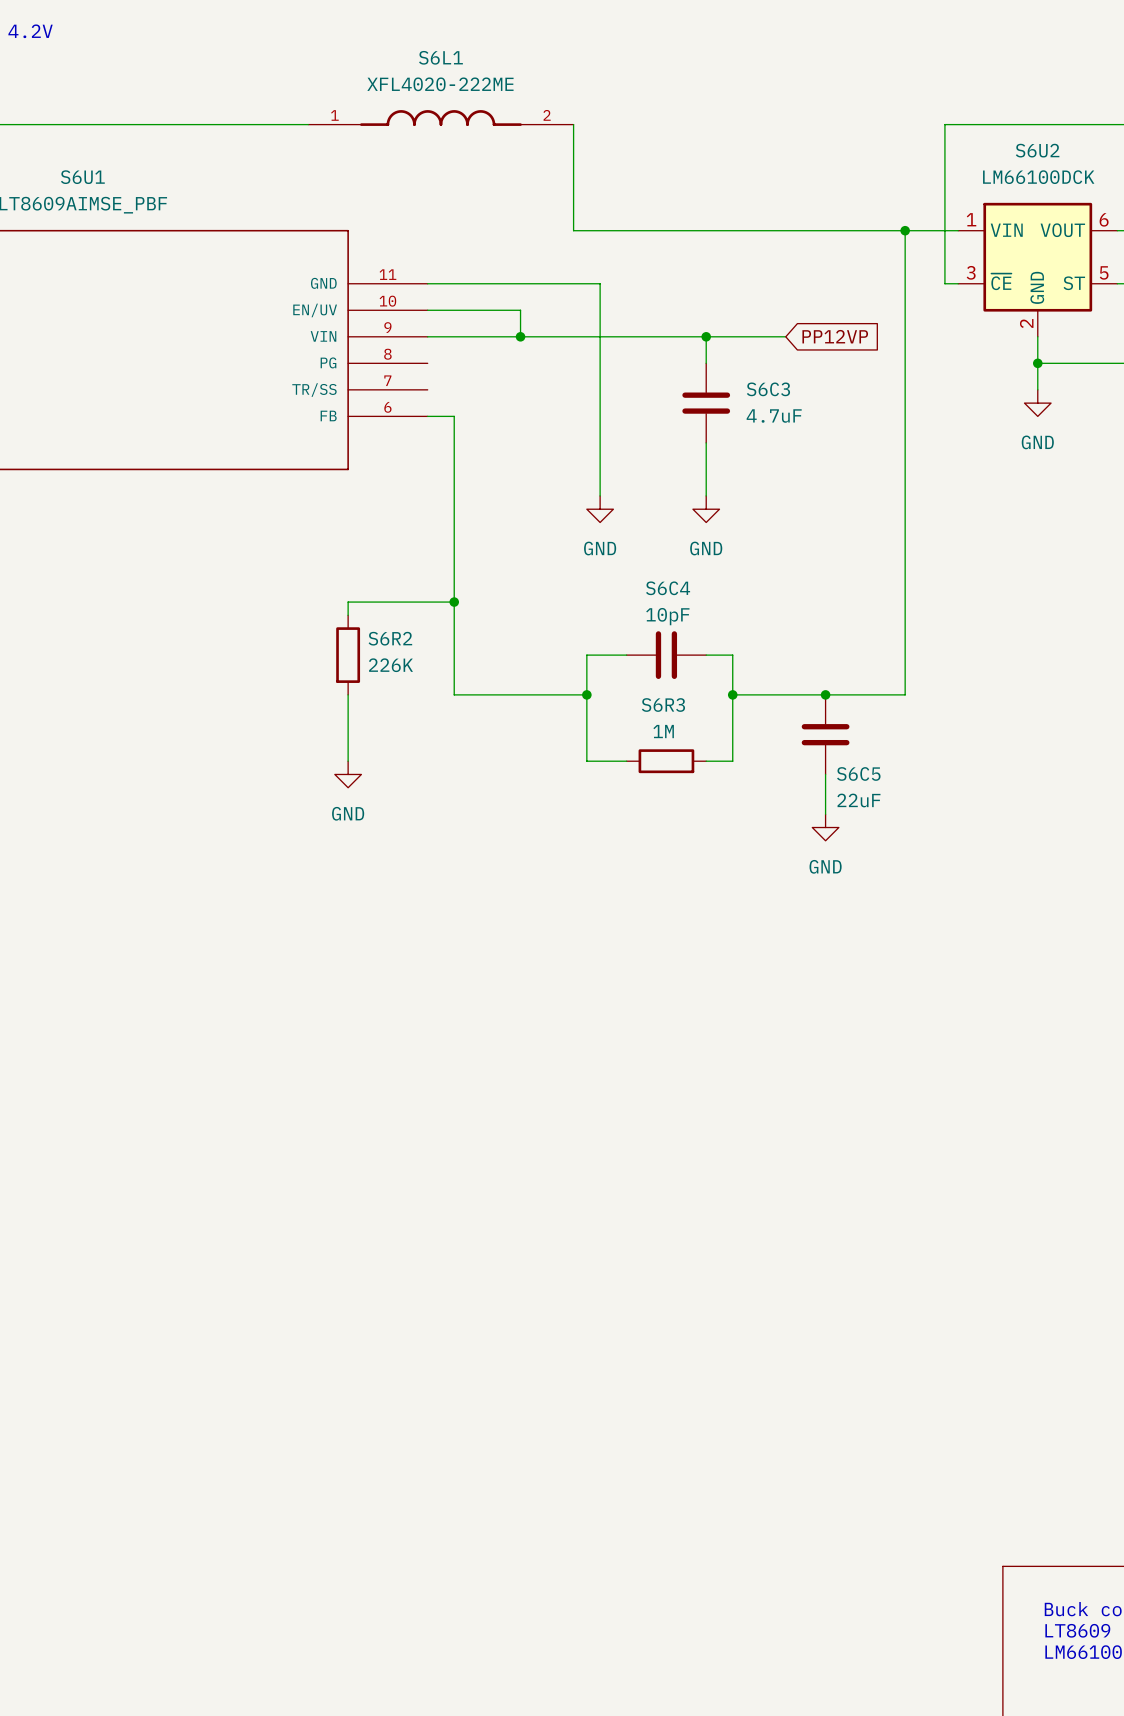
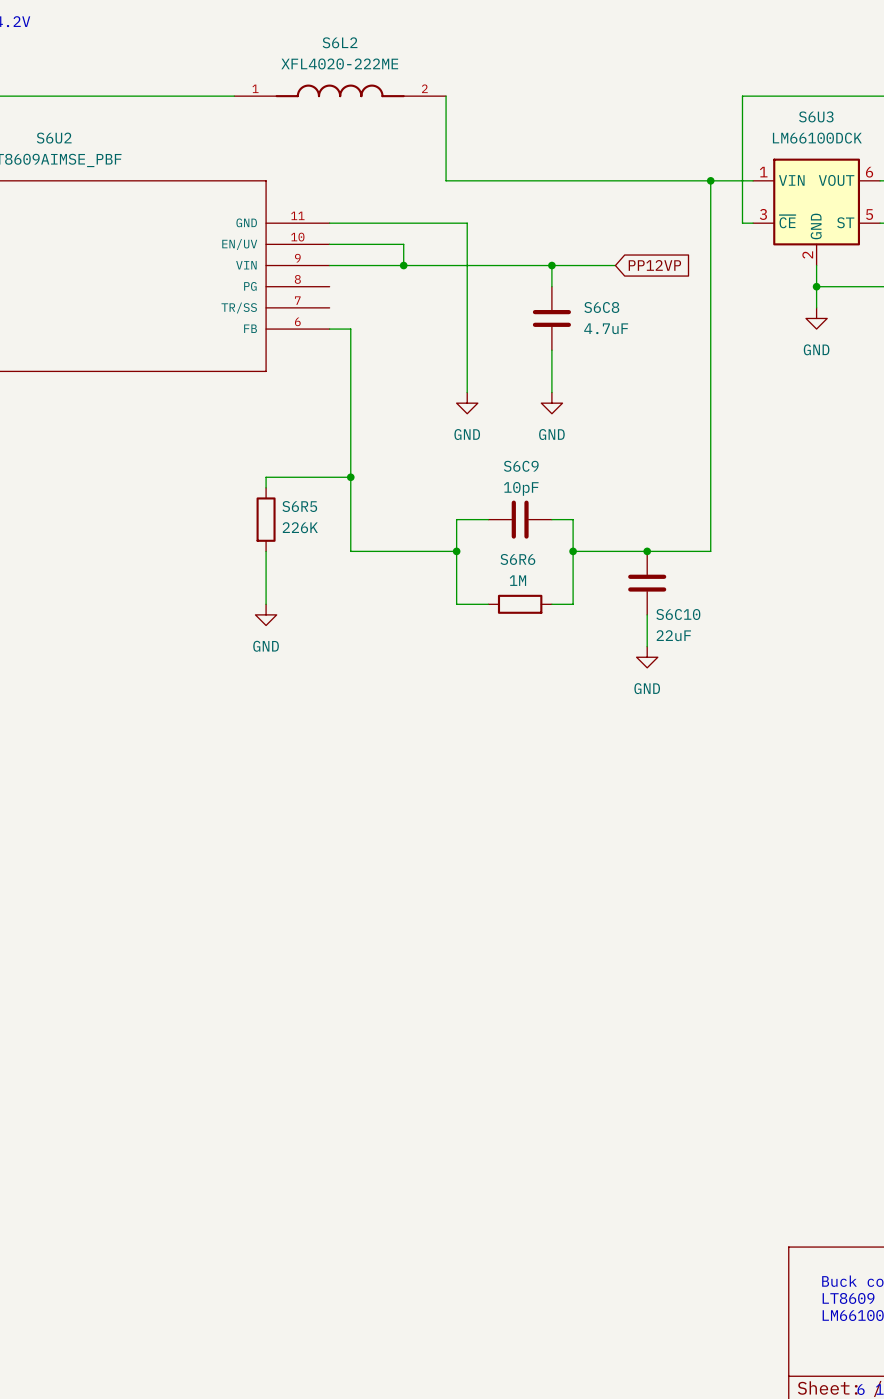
S6L1 name: S6L1 (440, 57) -> S6L2 (340, 42)
S6U2 name: S6U2 (1037, 150) -> S6U3 (816, 116)
S6U1 name: S6U1 (82, 177) -> S6U2 (54, 138)
S6C3 name: S6C3 (768, 389) -> S6C8 (601, 307)
S6C4 name: S6C4 (668, 588) -> S6C9 (521, 466)
S6R2 name: S6R2 (390, 638) -> S6R5 (299, 506)
S6R3 name: S6R3 (663, 705) -> S6R6 (517, 559)
S6C5 name: S6C5 (858, 773) -> S6C10 (678, 614)

